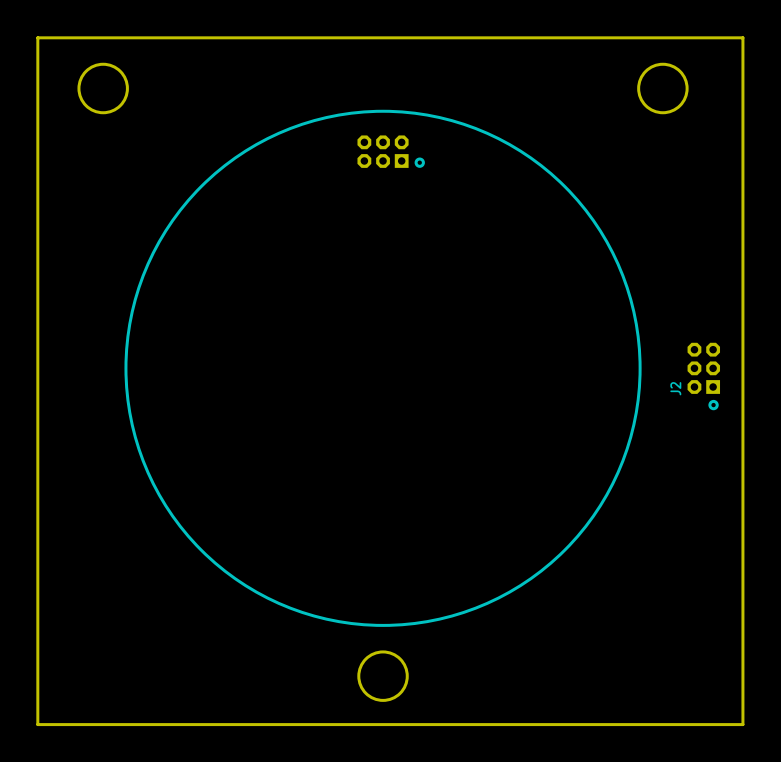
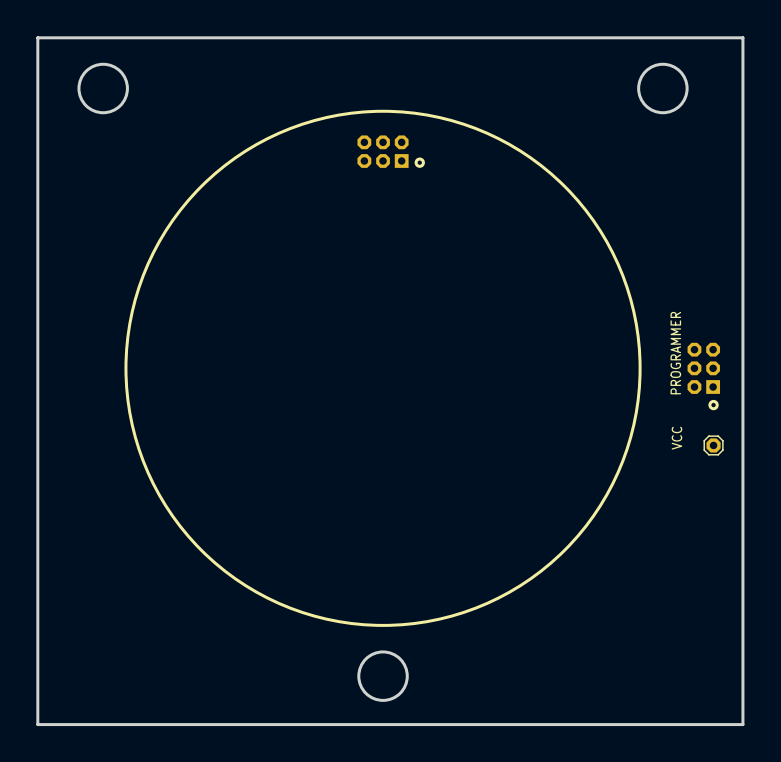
J2 name: J2 (675, 388) -> PROGRAMMER (675, 353)
VCC: none -> (713, 445)

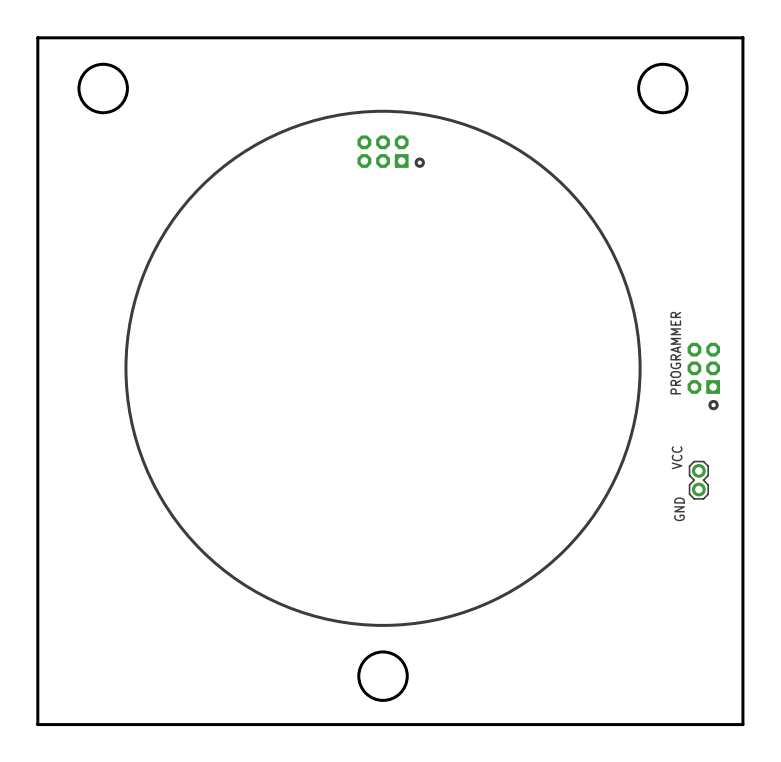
VCC: (713, 445) -> none
VCC: none -> (698, 480)
text: none -> GND (679, 509)

